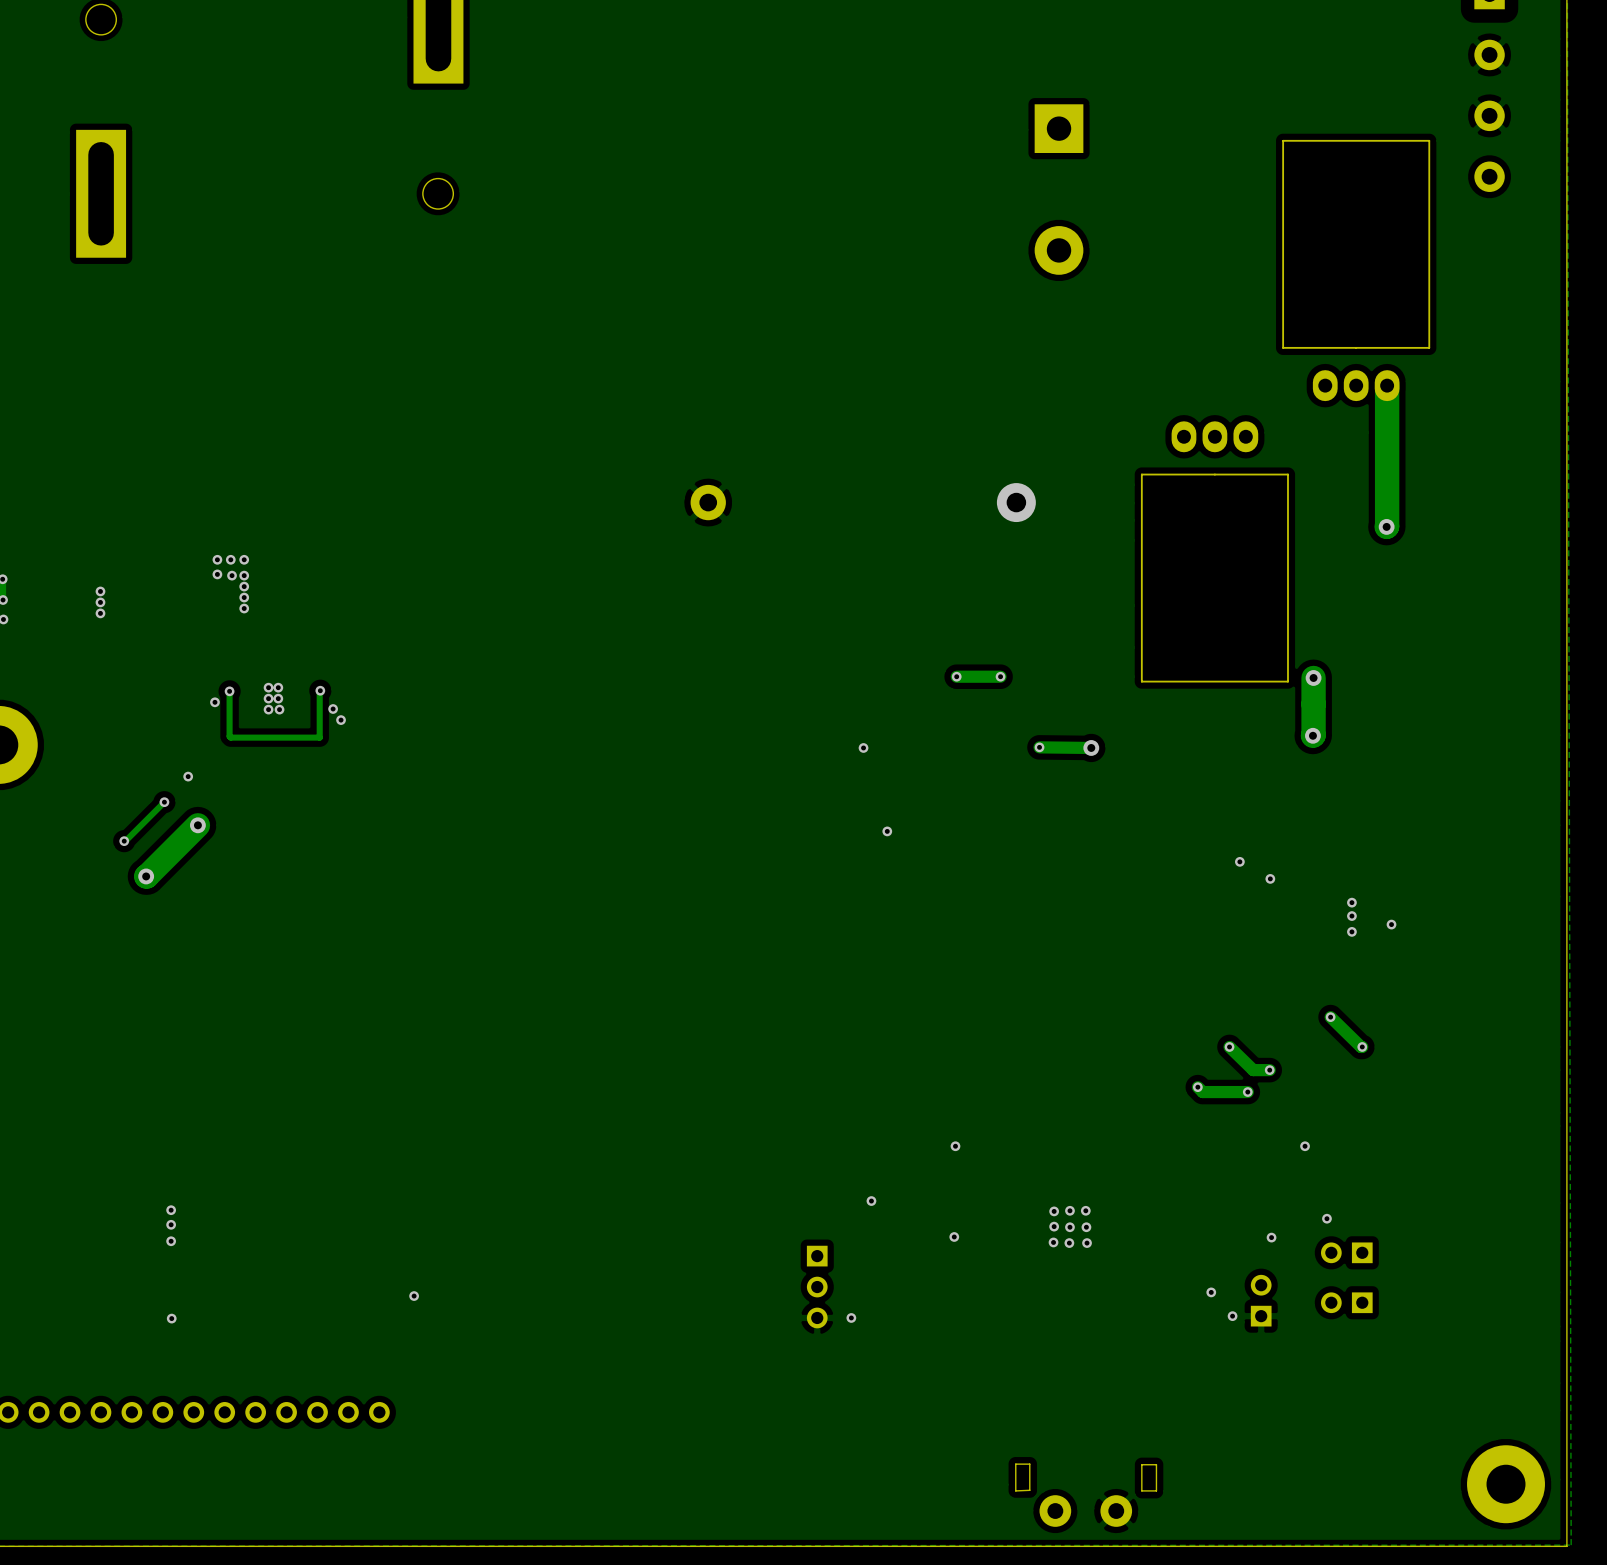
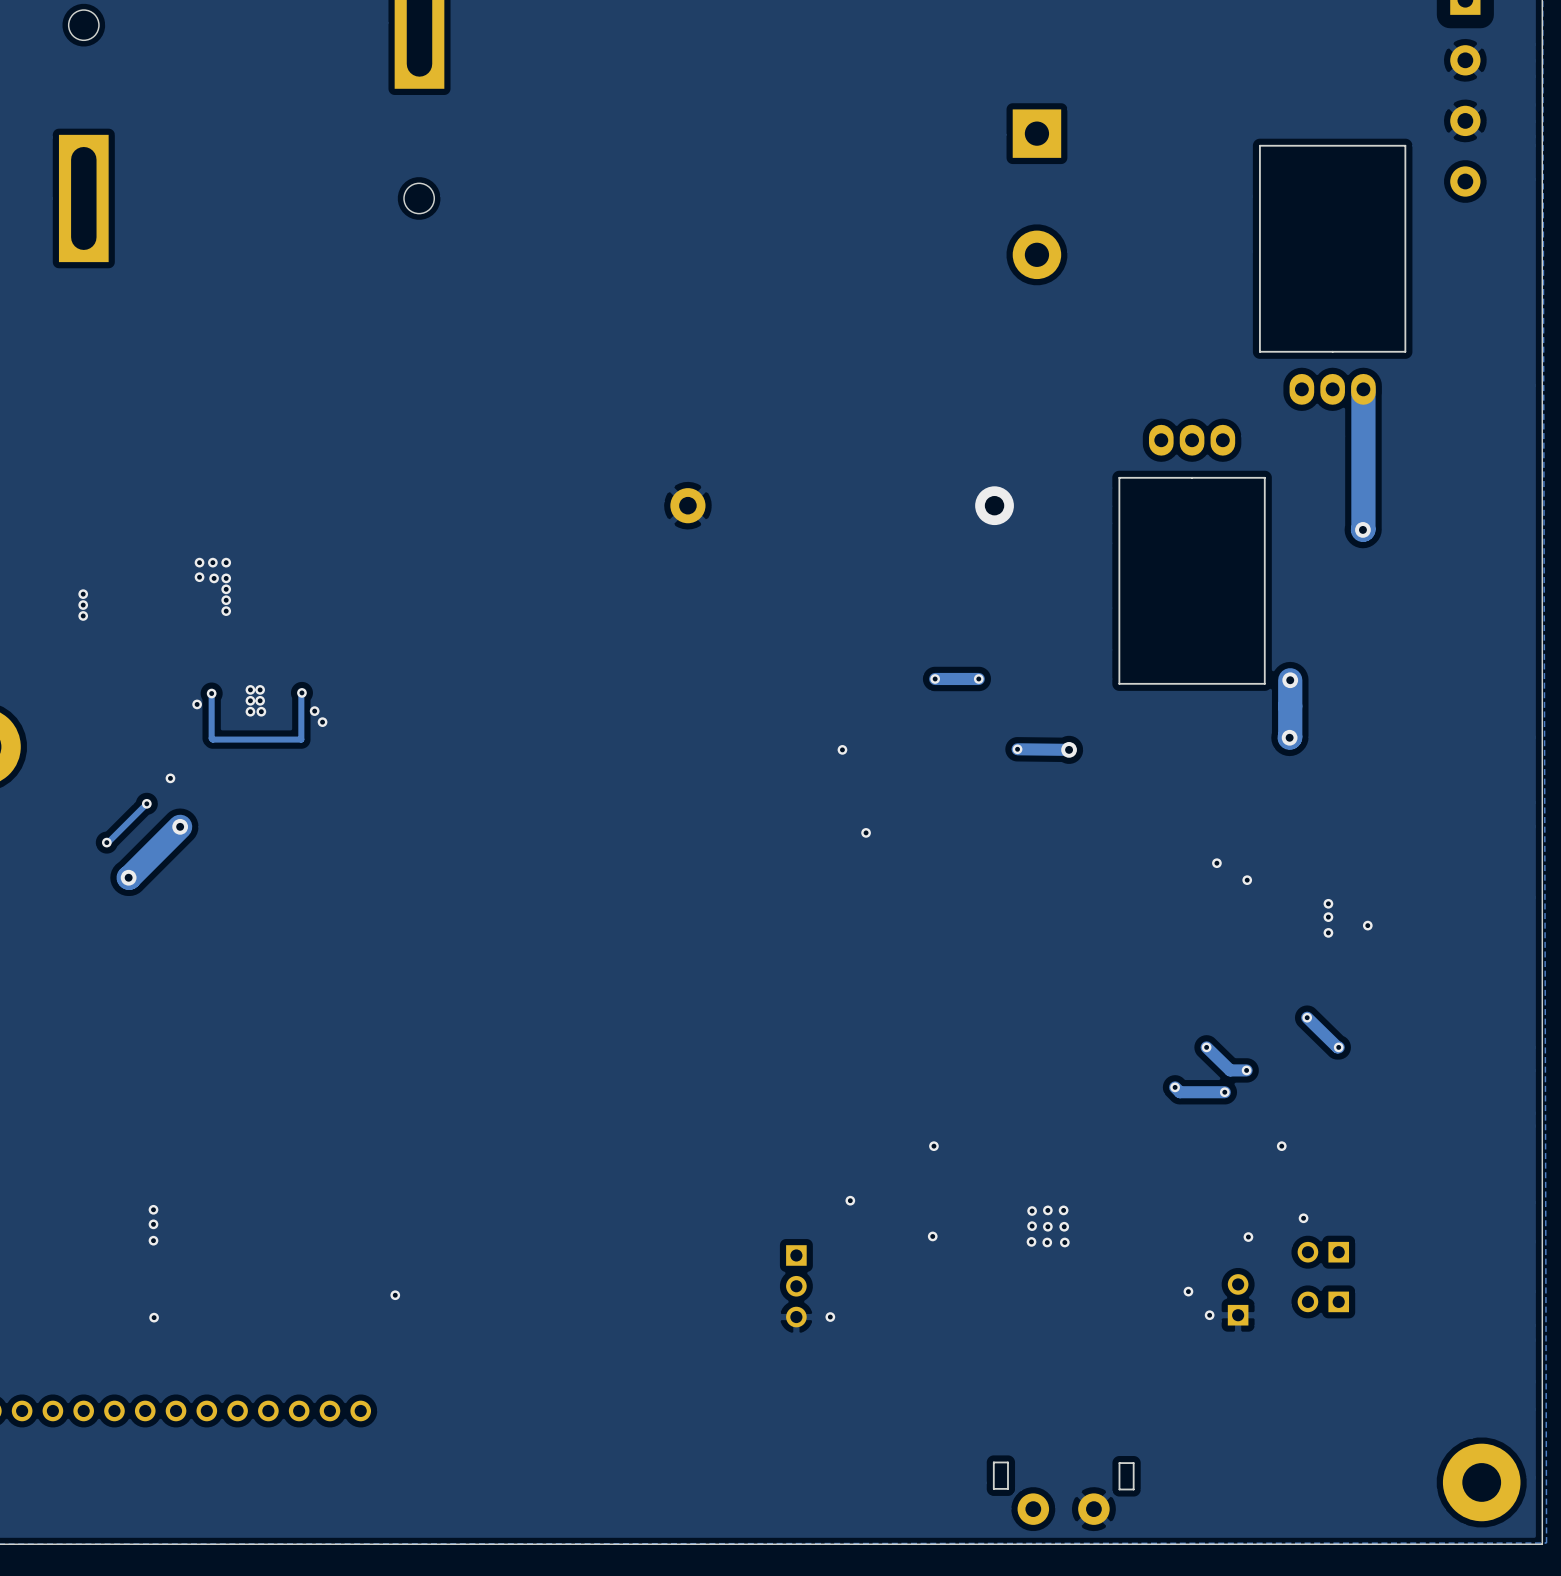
board edge: (1029, 1464) (1015, 1464) (1015, 1490) (1029, 1490) (1029, 1464) -> none
board edge: (1156, 1464) (1141, 1464) (1141, 1490) (1156, 1490) (1156, 1464) -> none
part: none -> (1063, 1493)

